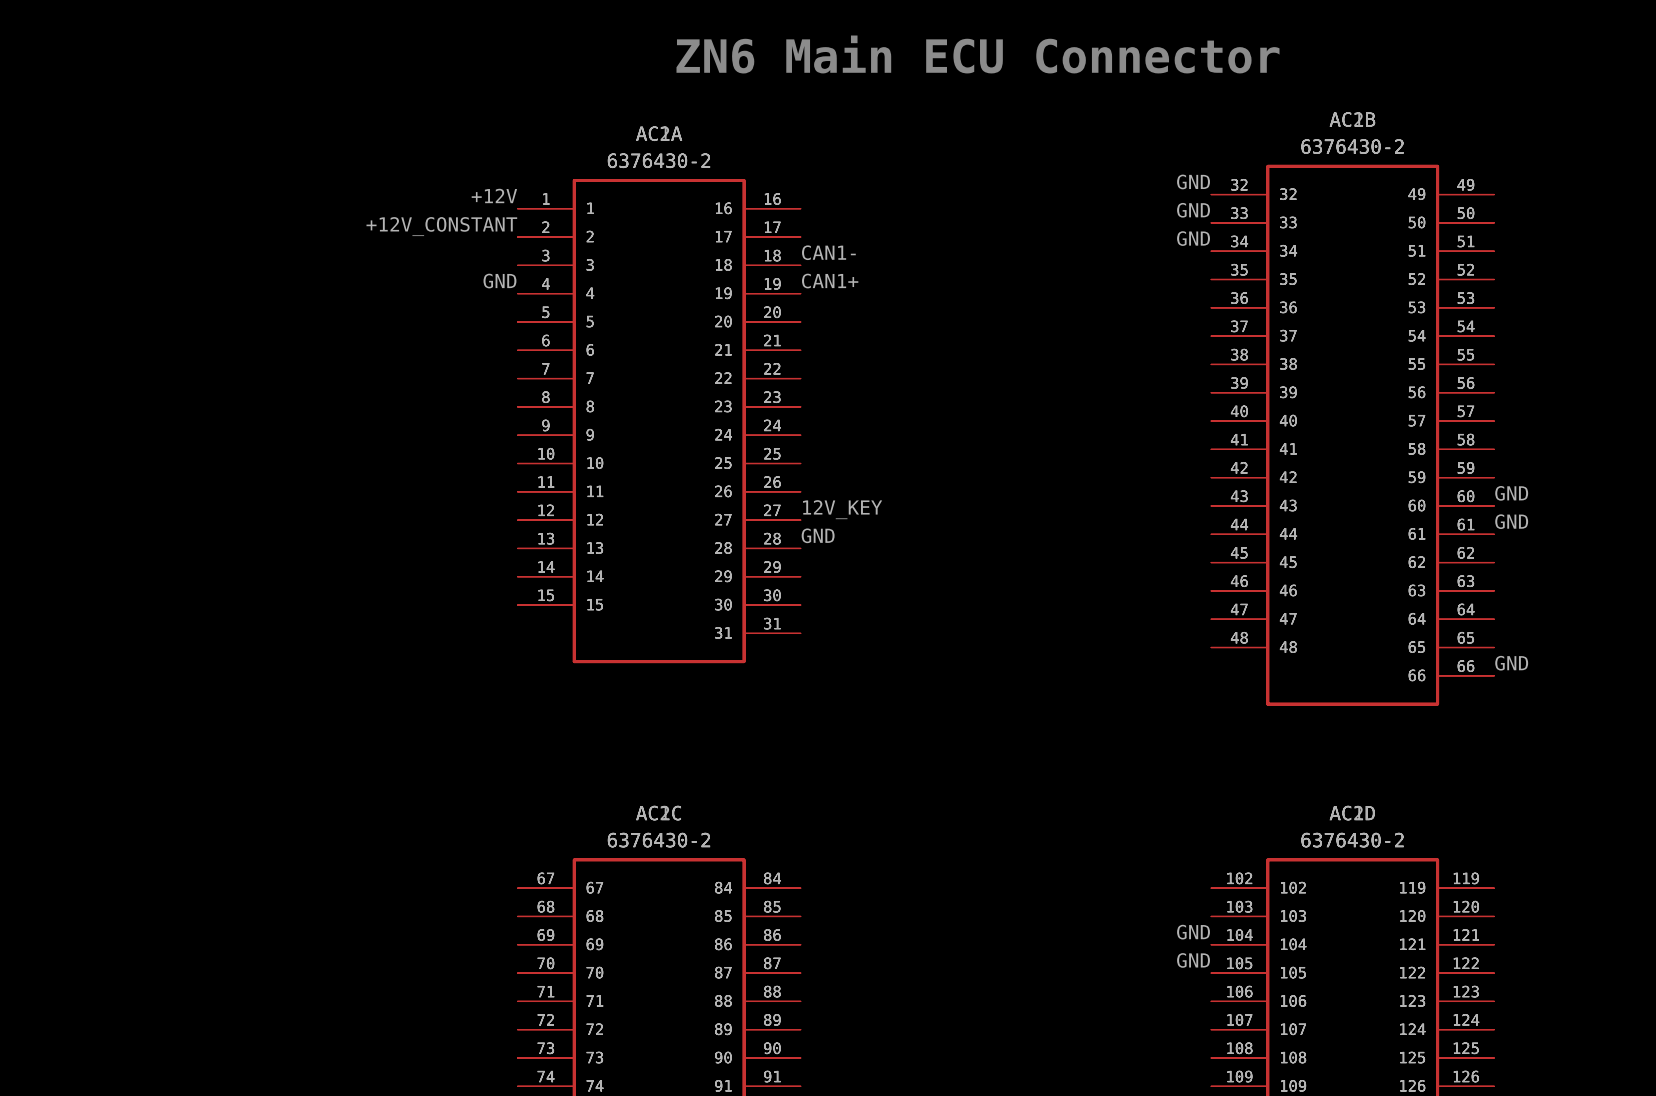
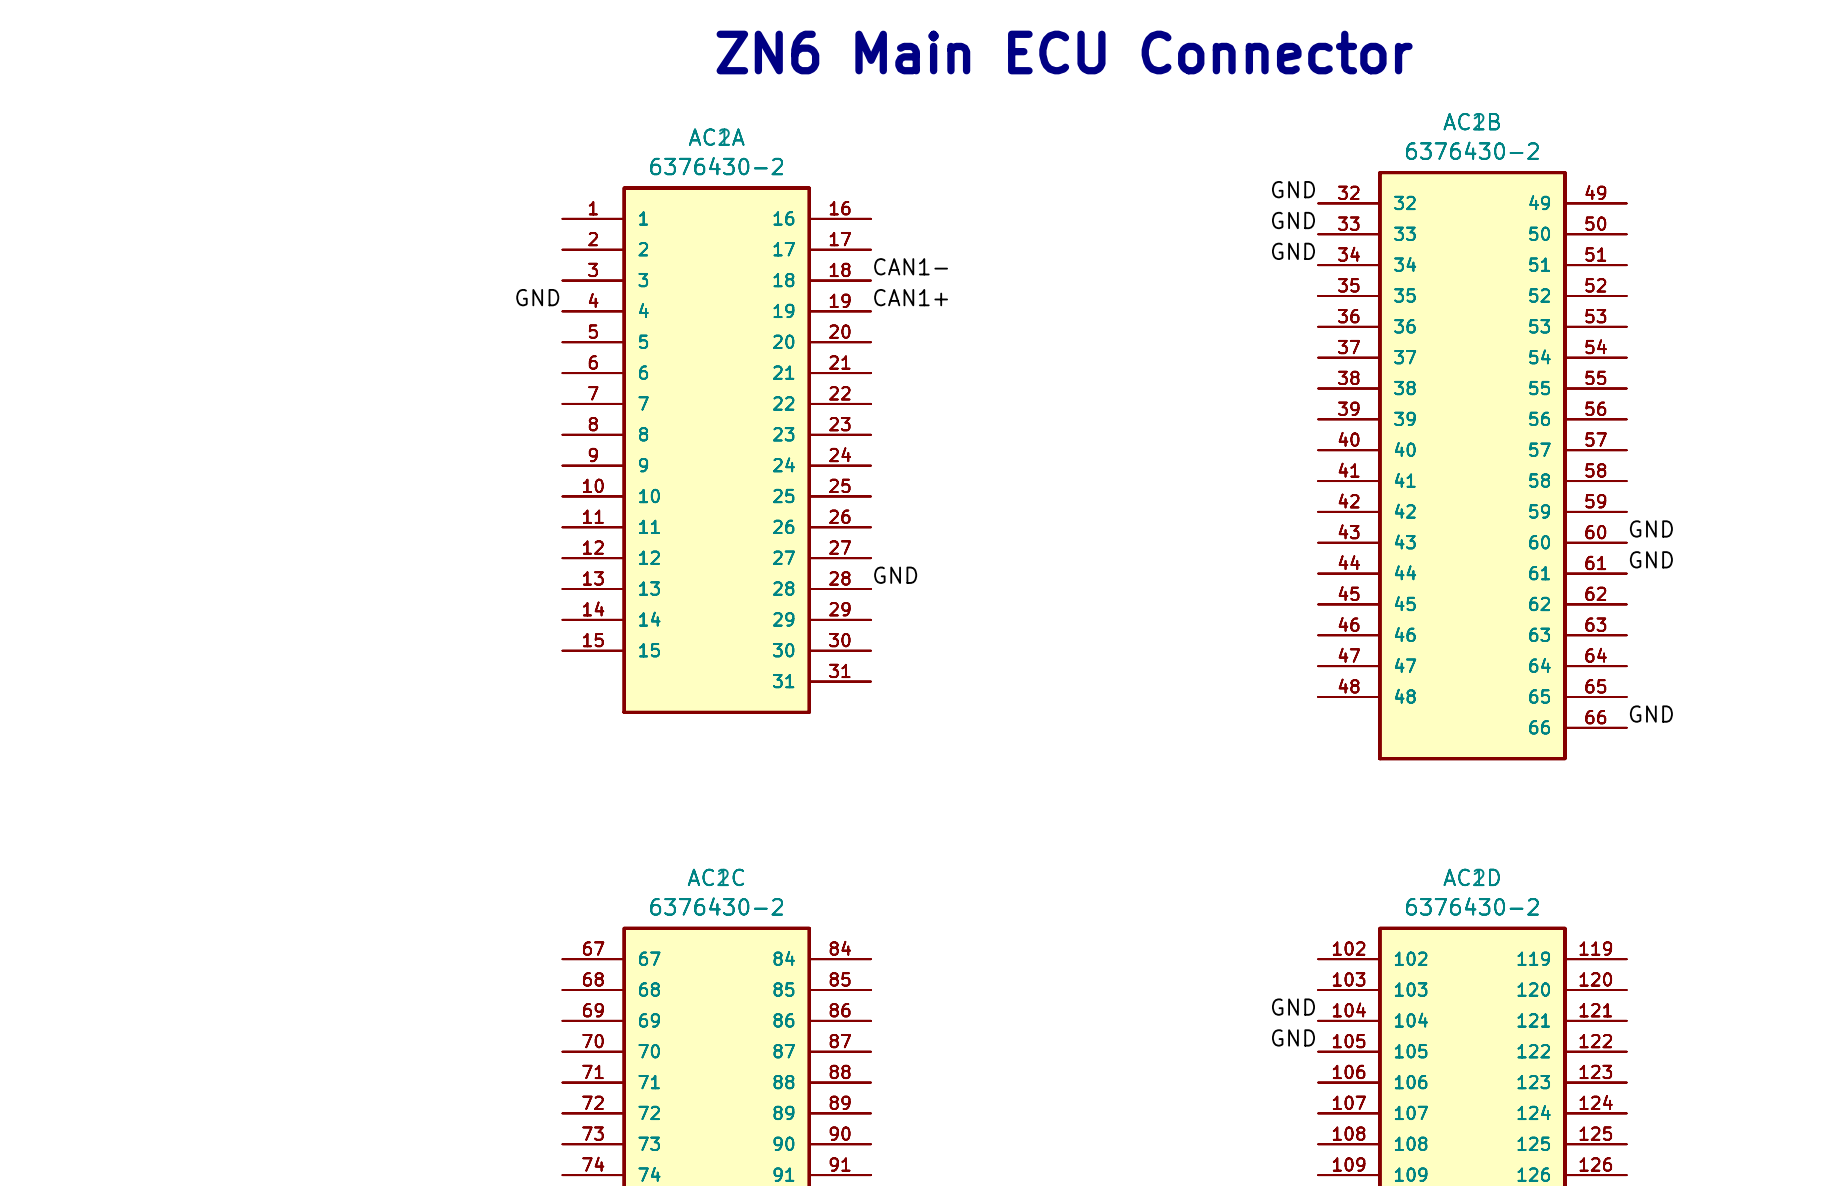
label: +12V (494, 195) -> none
label: +12V_CONSTANT (441, 226) -> none
label: 12V_KEY (842, 509) -> none

